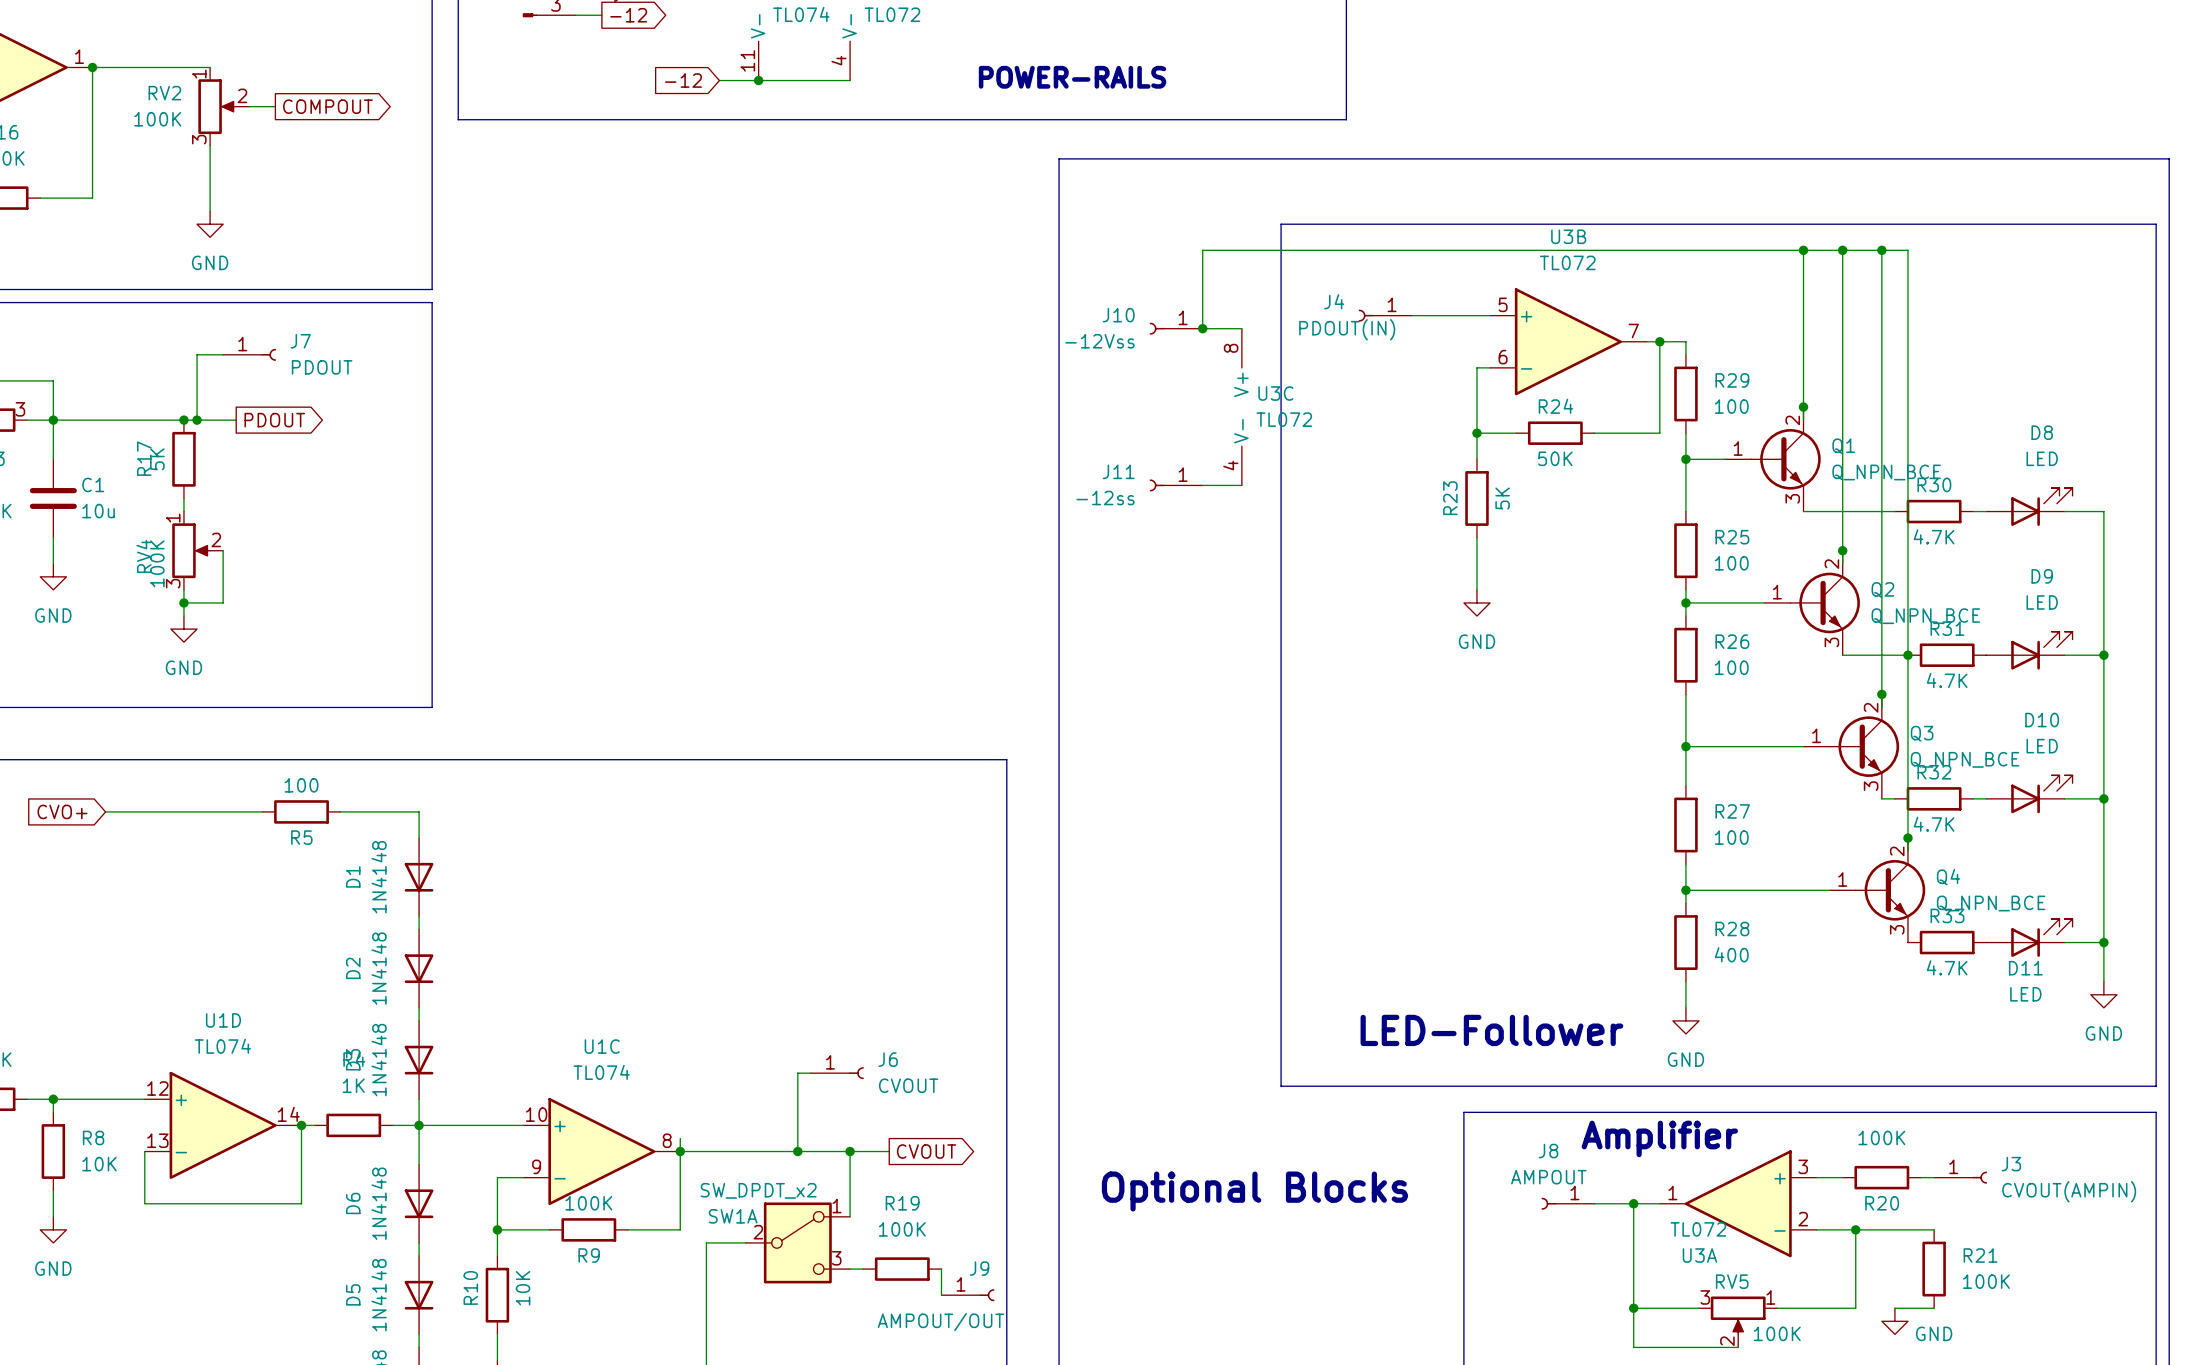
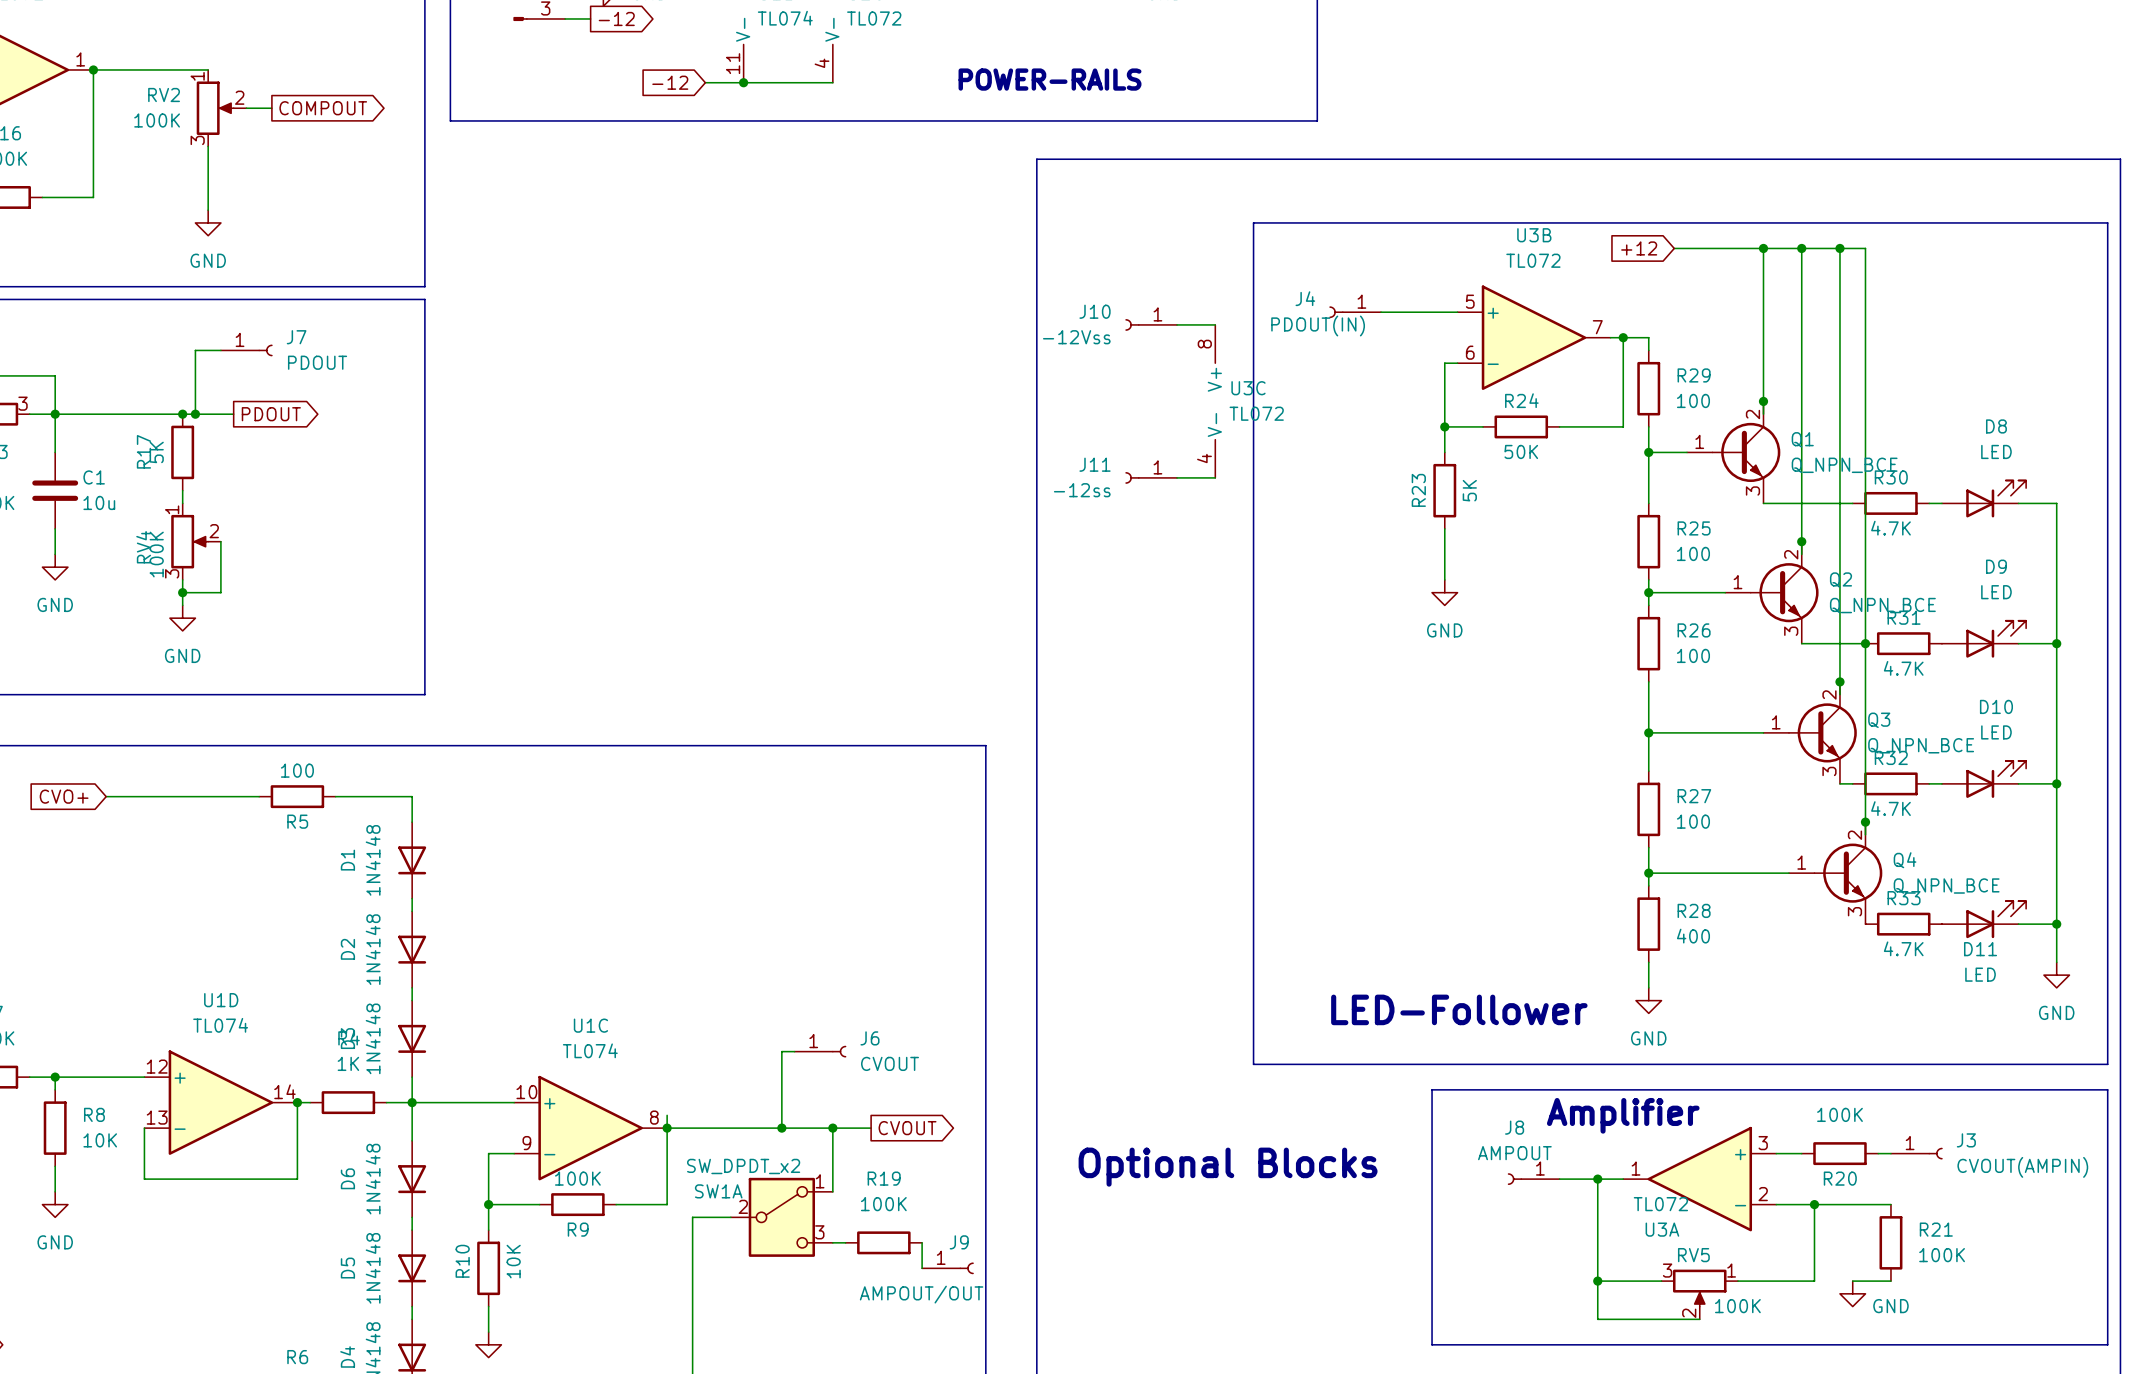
global label: none -> +12 (1639, 248)
wire: (1712, 250) (1202, 250) (1202, 328) -> none
junction: (1202, 328) -> none

